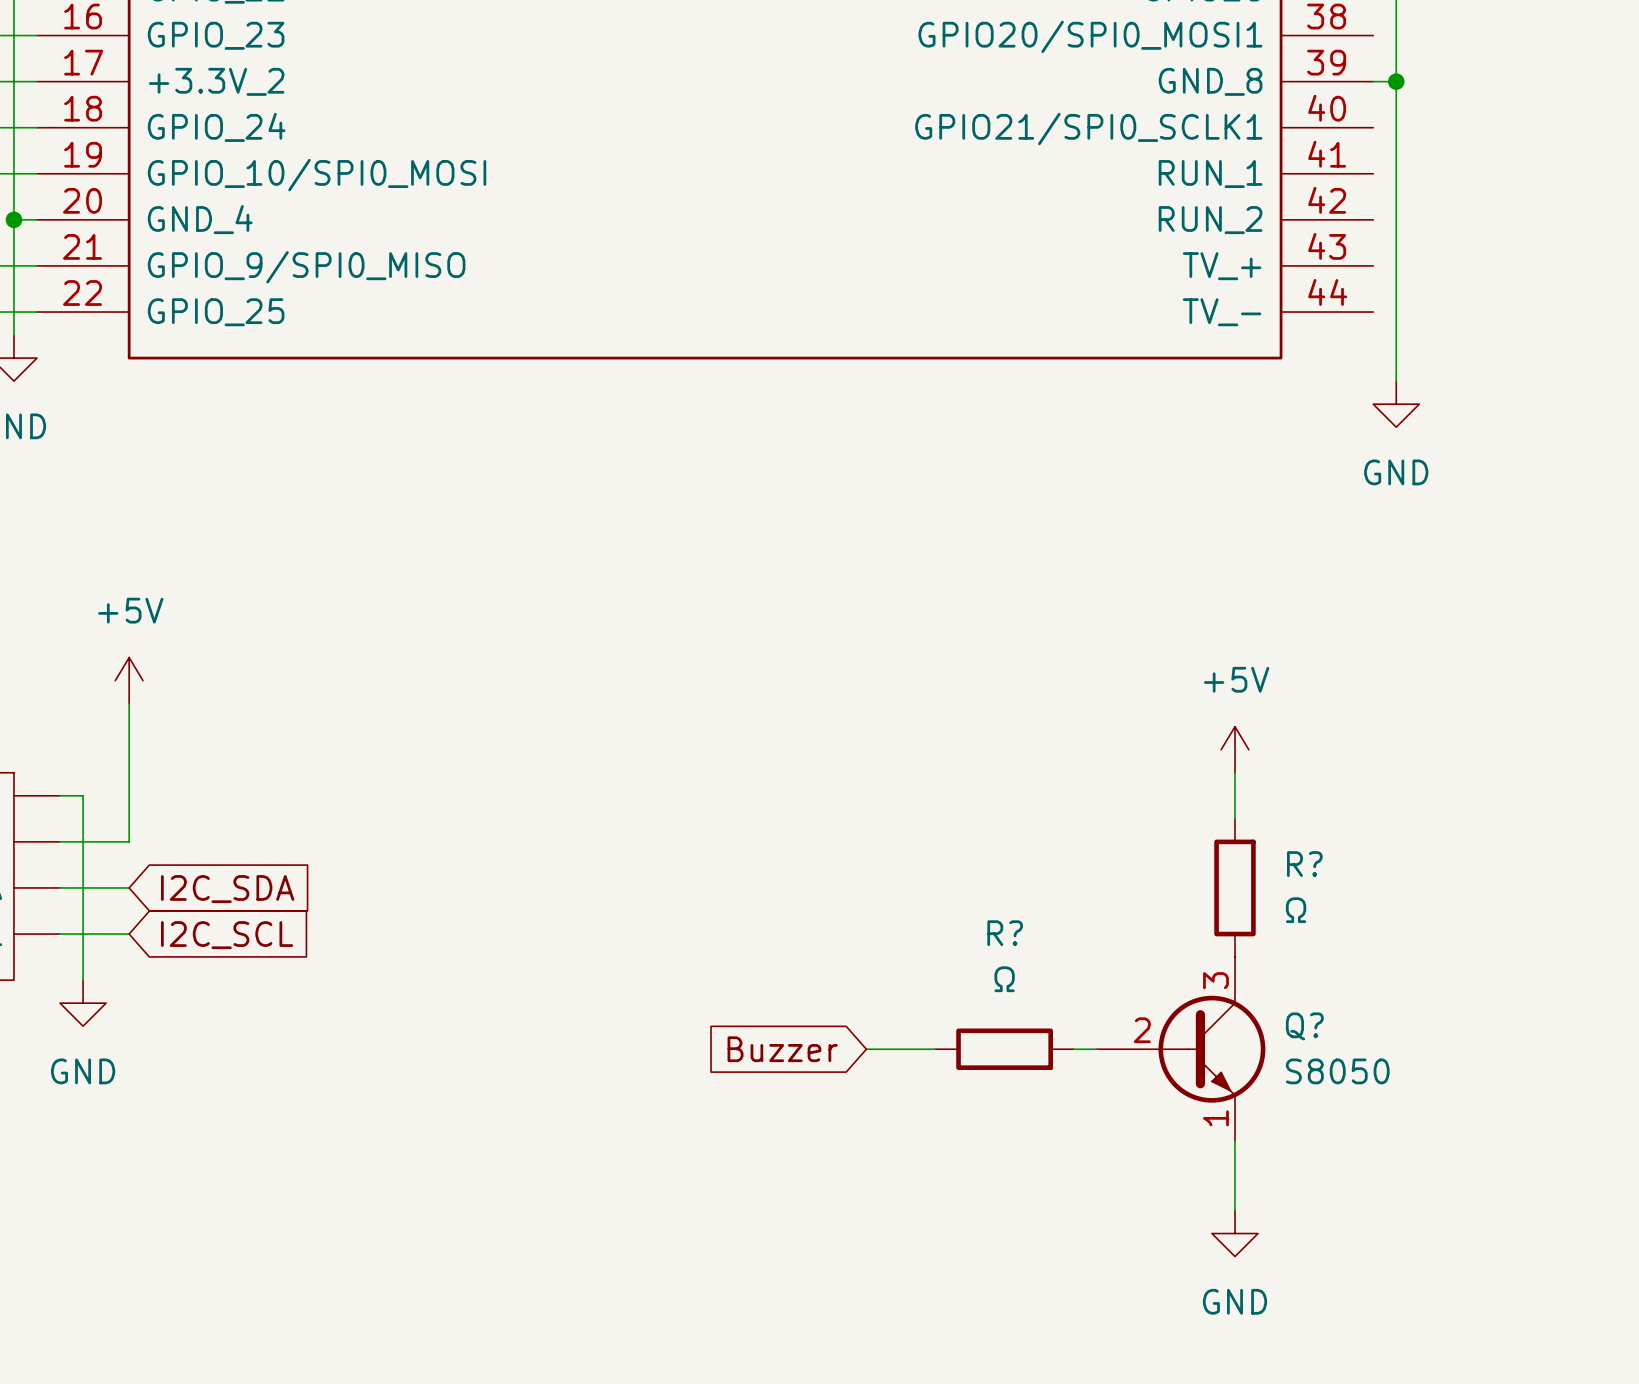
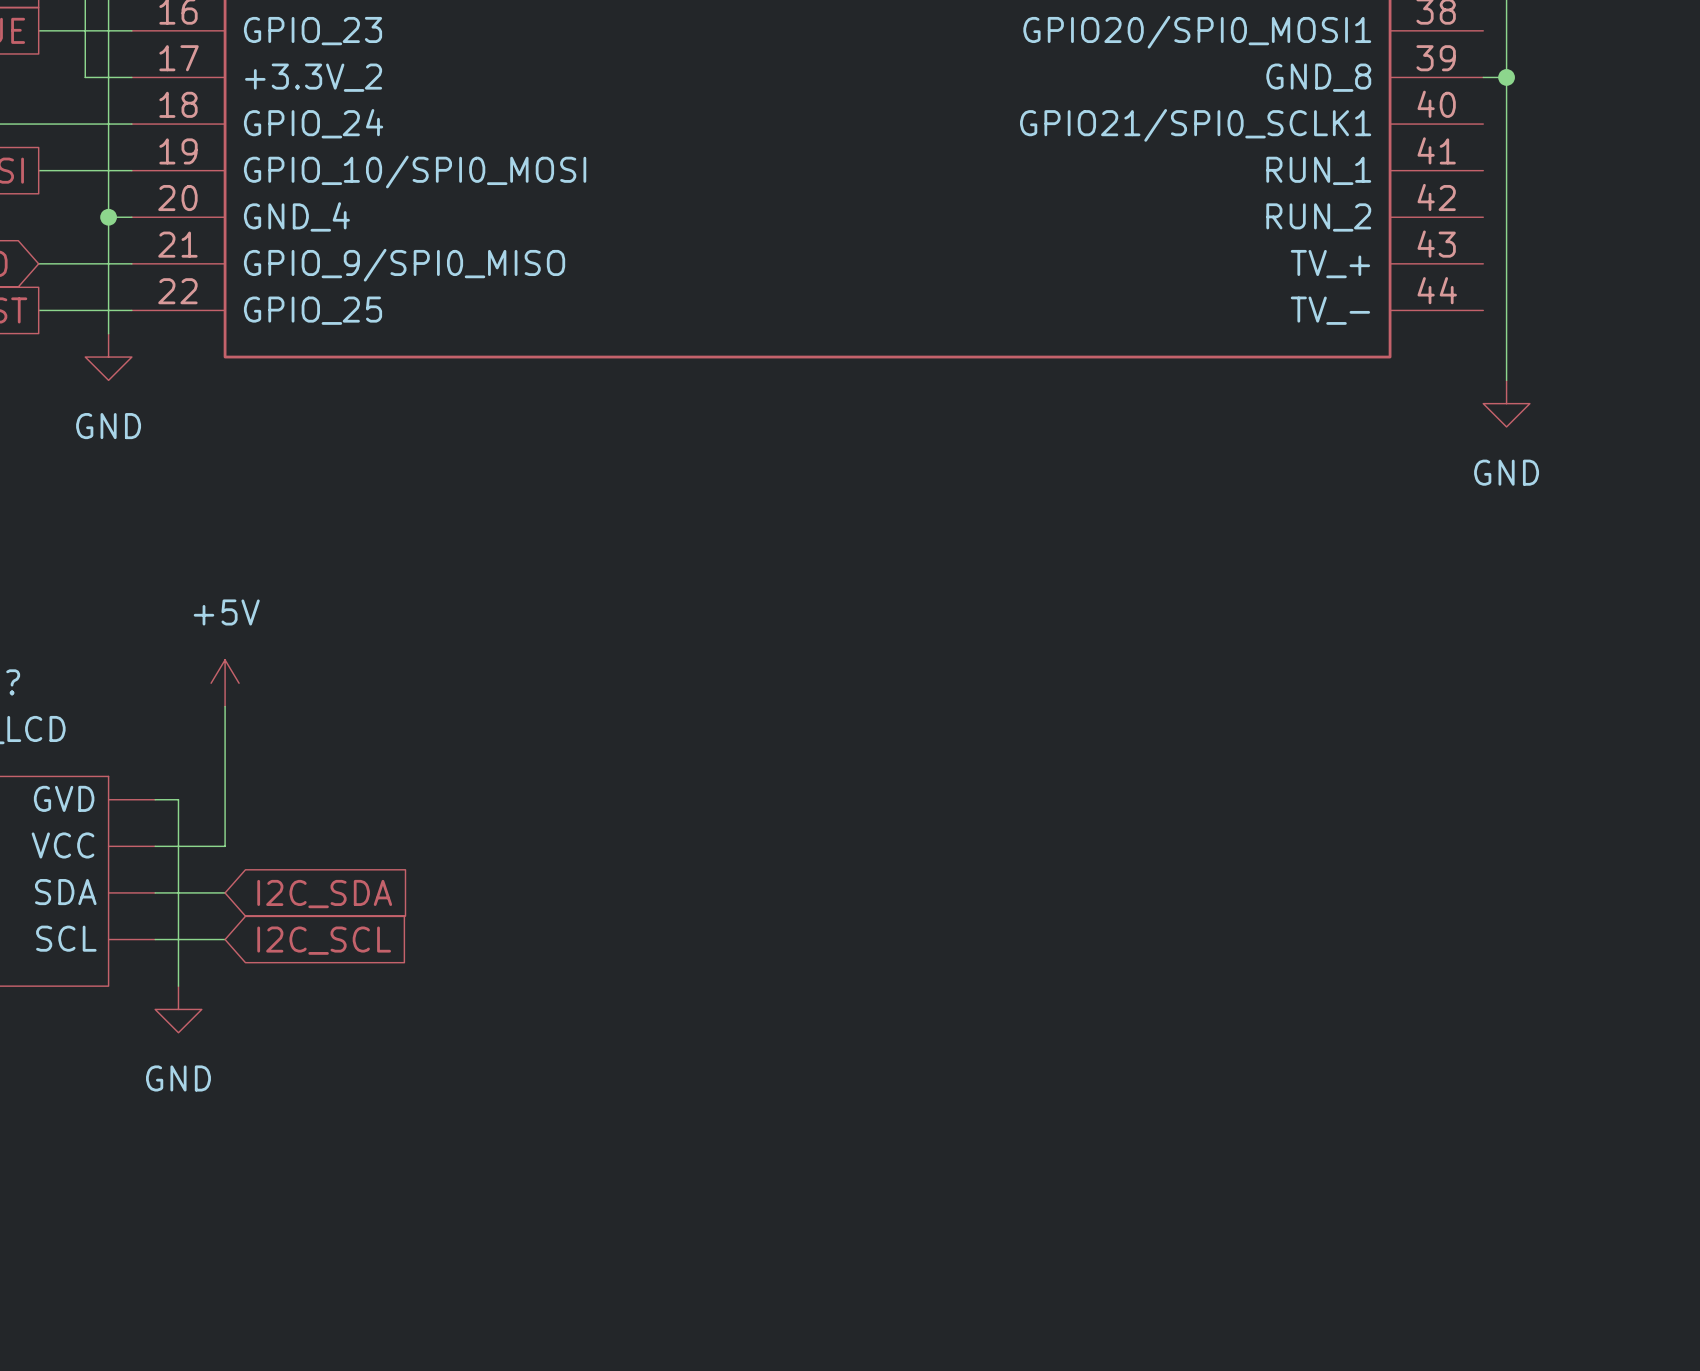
power symbol: +5V (1234, 749) -> none
wire: (1234, 772) (1234, 818) -> none
R?: Ω (1234, 887) -> none
global label: Buzzer (782, 1049) -> none
wire: (866, 1049) (935, 1049) -> none
R?: Ω (1004, 1049) -> none
wire: (1073, 1049) (1096, 1049) -> none
Q?: S8050 (1181, 1049) -> none
wire: (1234, 1141) (1234, 1210) -> none
power symbol: GND (1234, 1233) -> none

